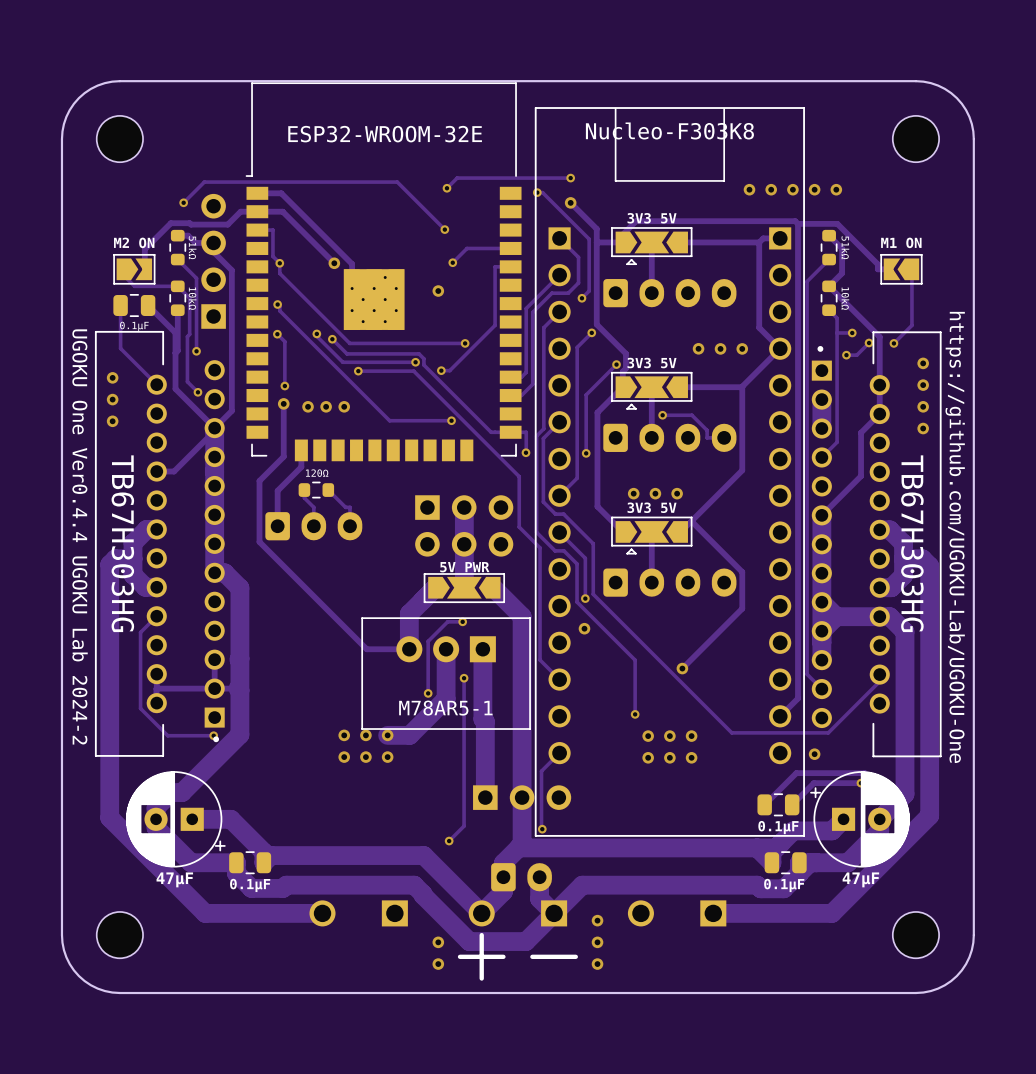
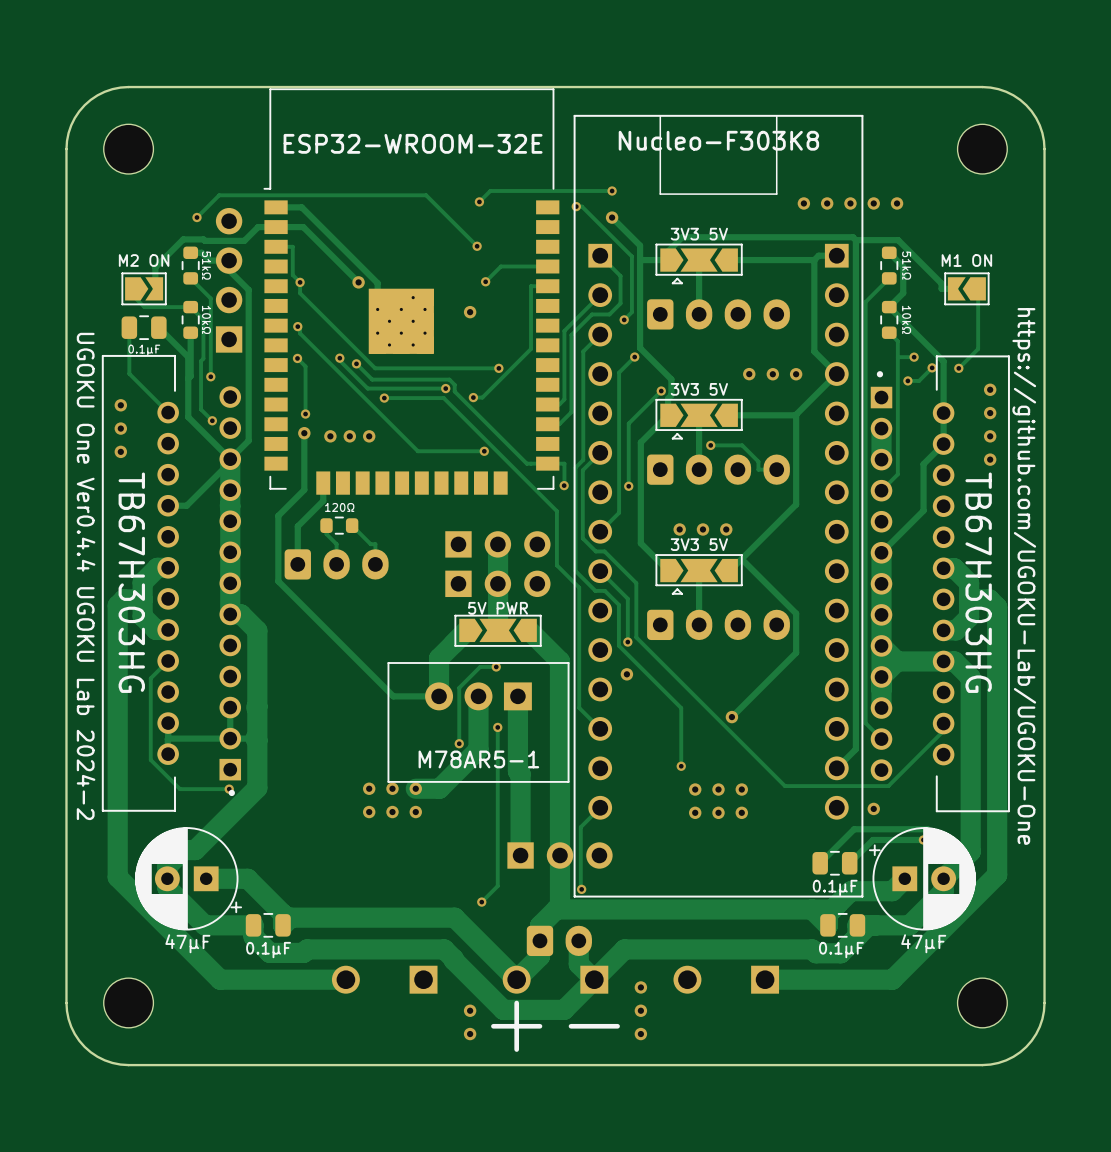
part: (464, 525) -> none
part: none -> (497, 583)

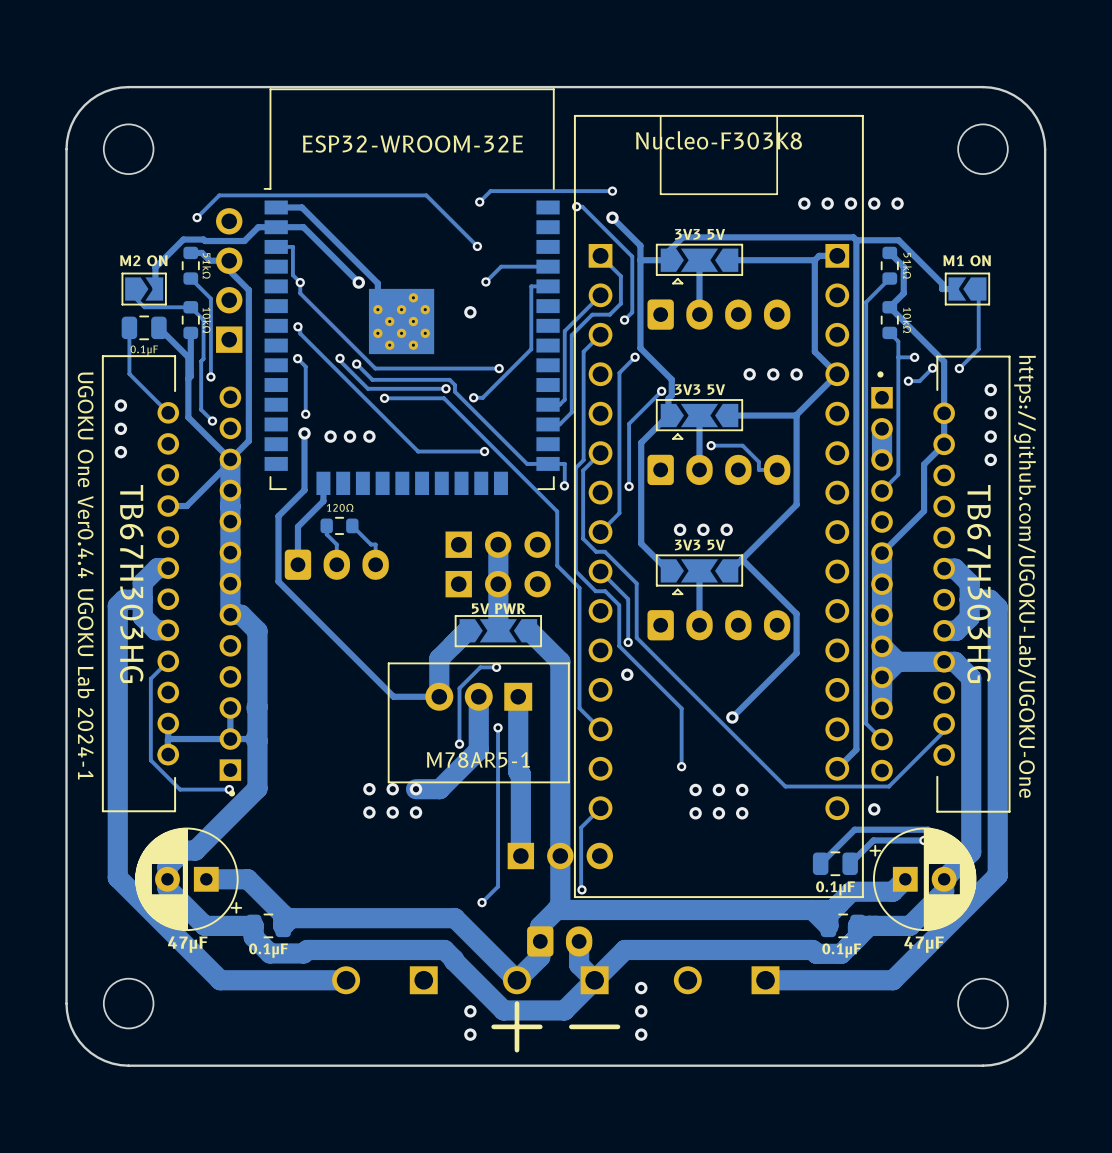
text: UGOKU One Ver0.4.4 UGOKU Lab 2024-2 (86, 576) -> UGOKU One Ver0.4.4 UGOKU Lab 2024-1 (86, 575)

